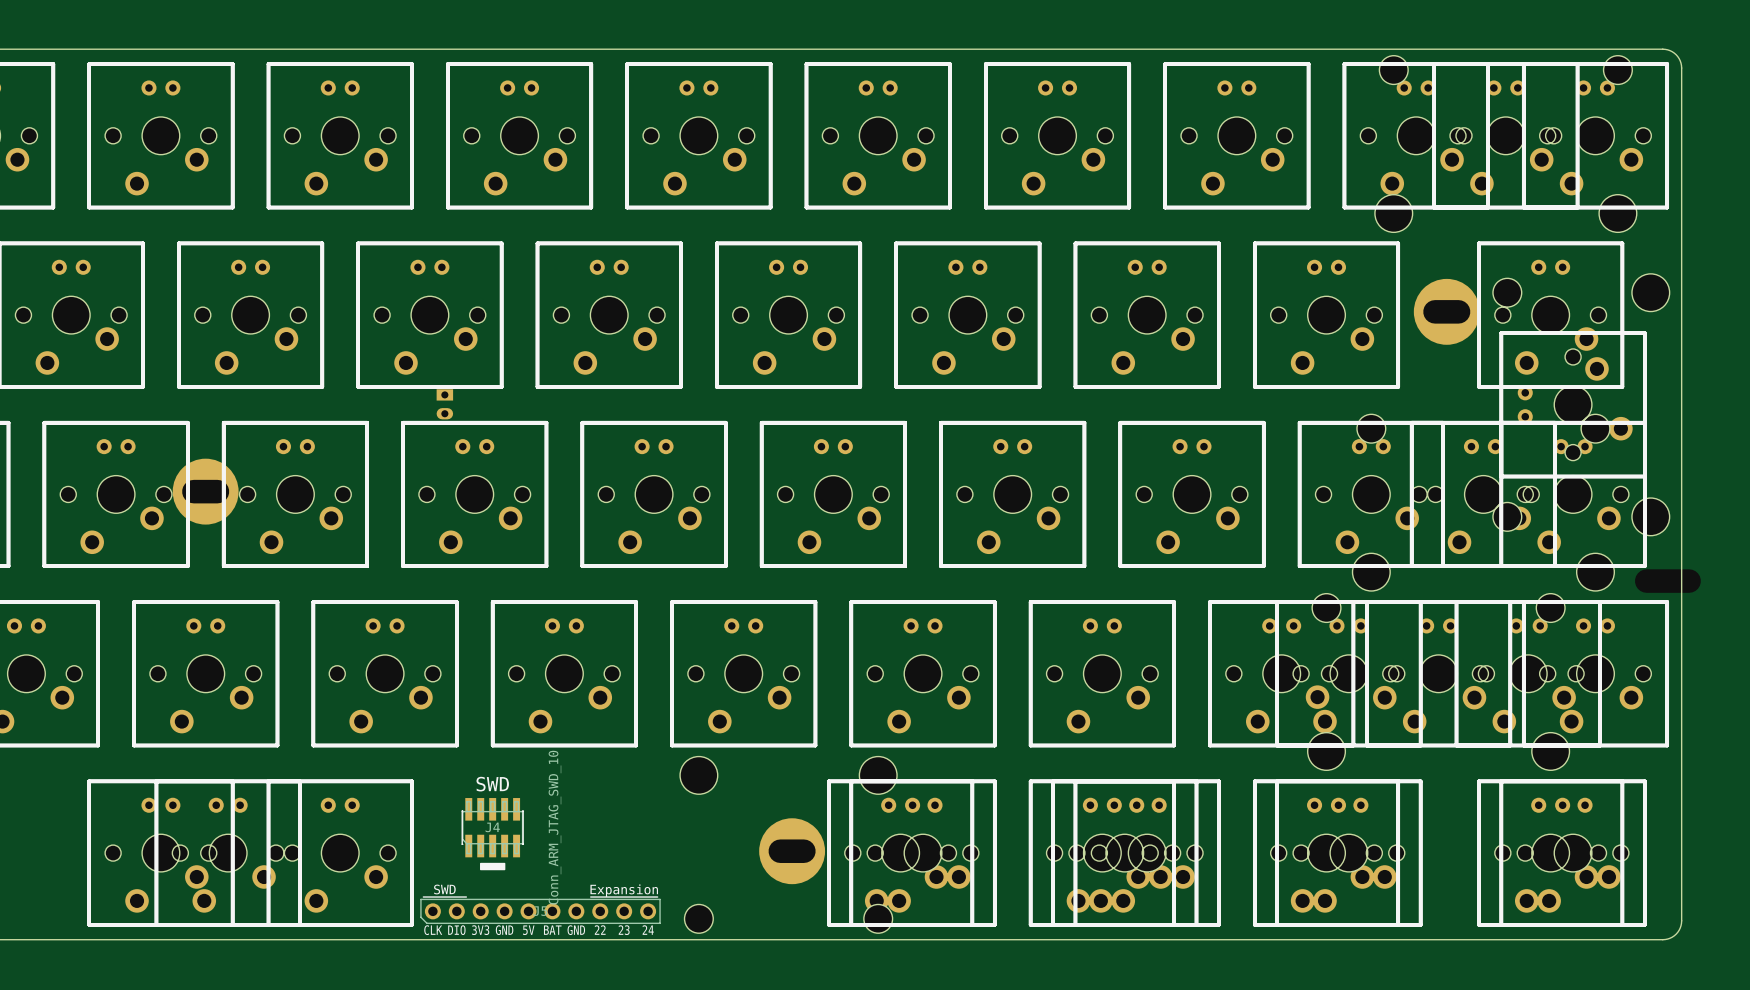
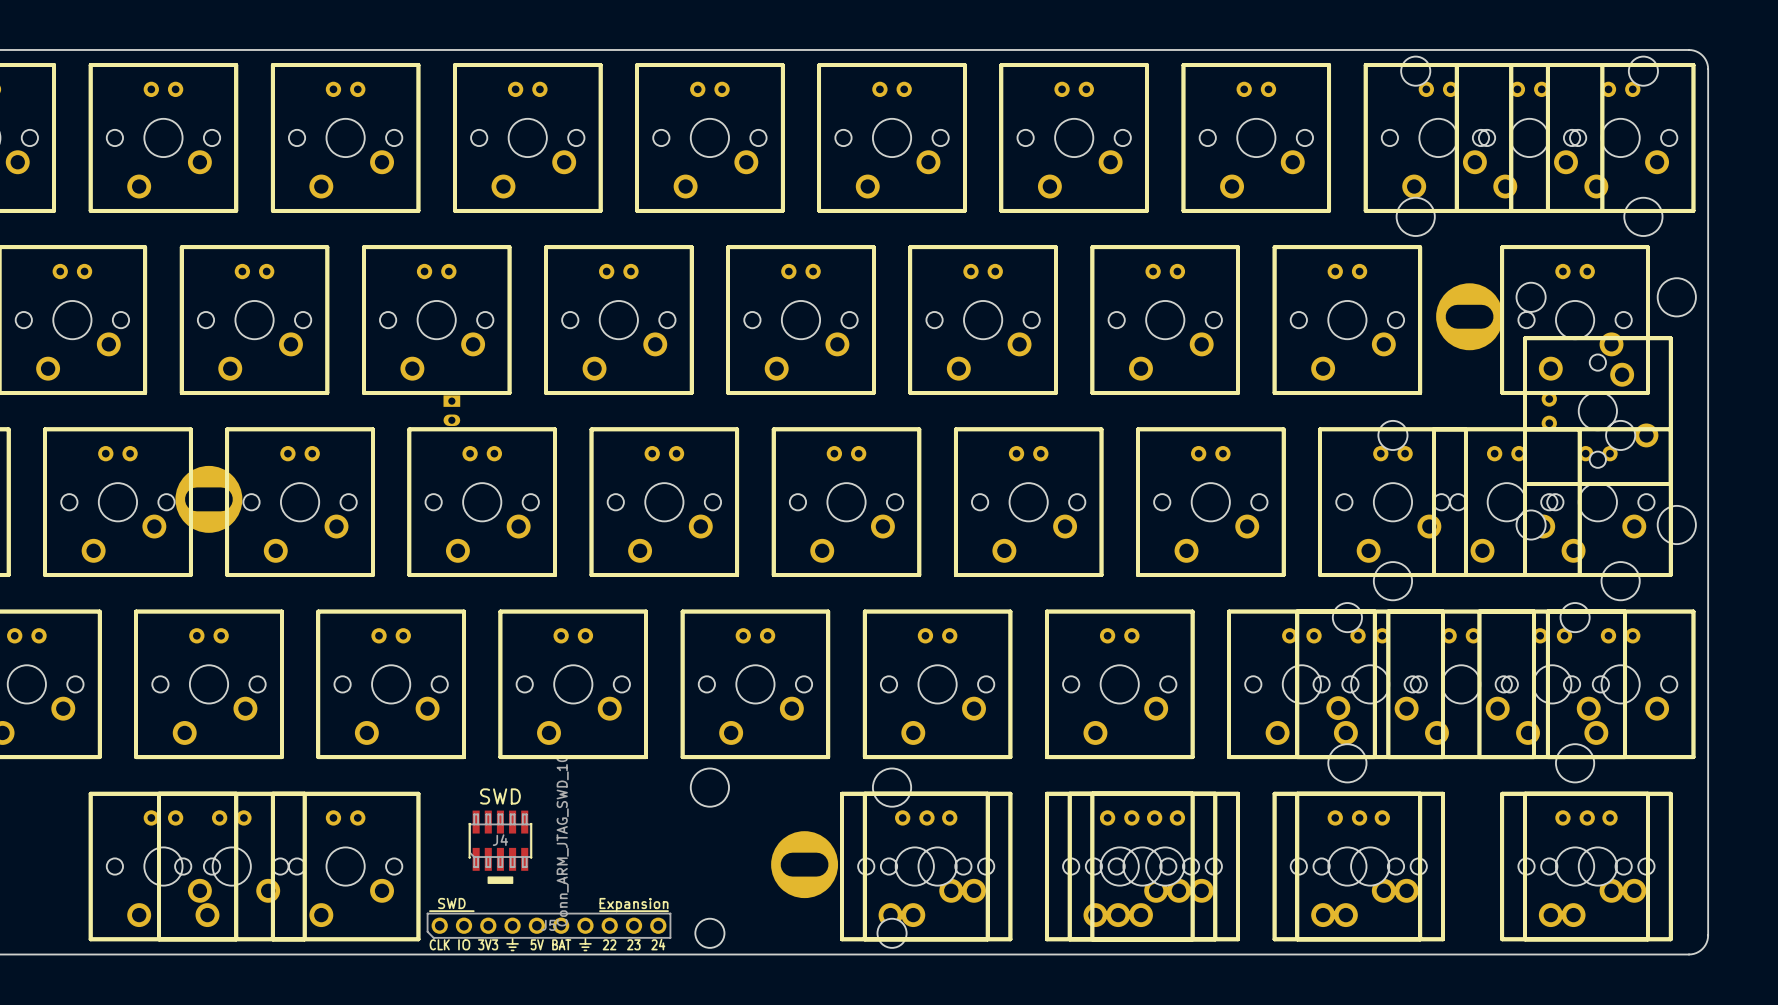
text: DIO (456, 930) -> IO (464, 944)
text: GND (504, 930) -> ⏚ (512, 944)
text: GND (576, 930) -> ⏚ (585, 944)

